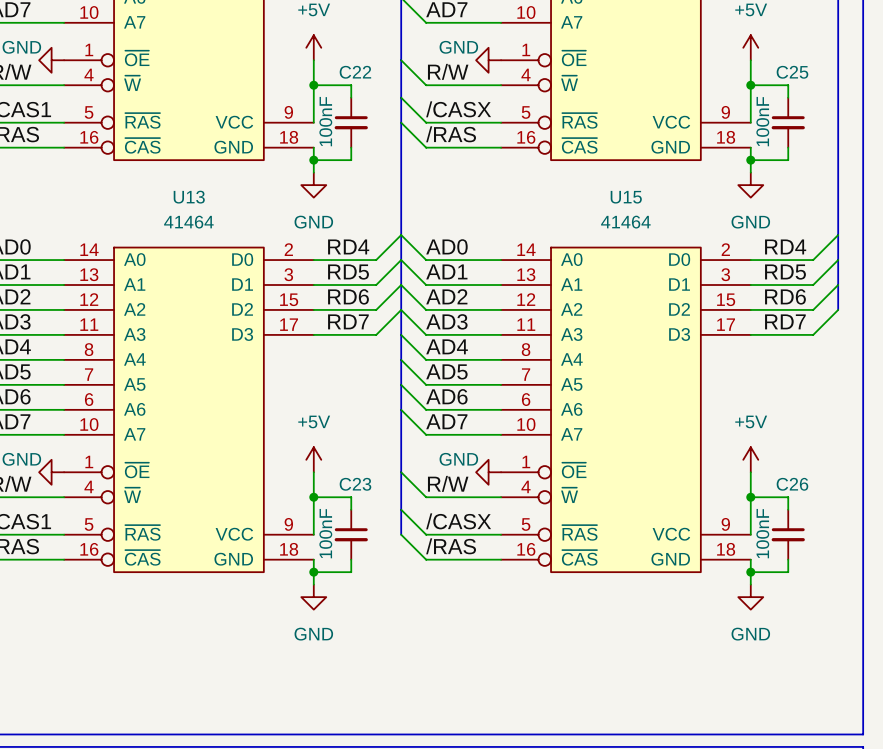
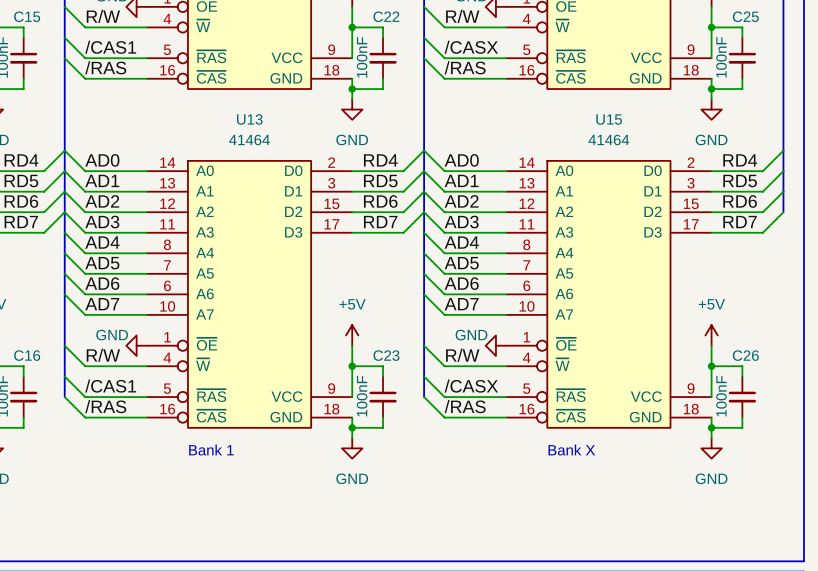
text: none -> Bank 1 (211, 450)
text: none -> Bank X (571, 450)

